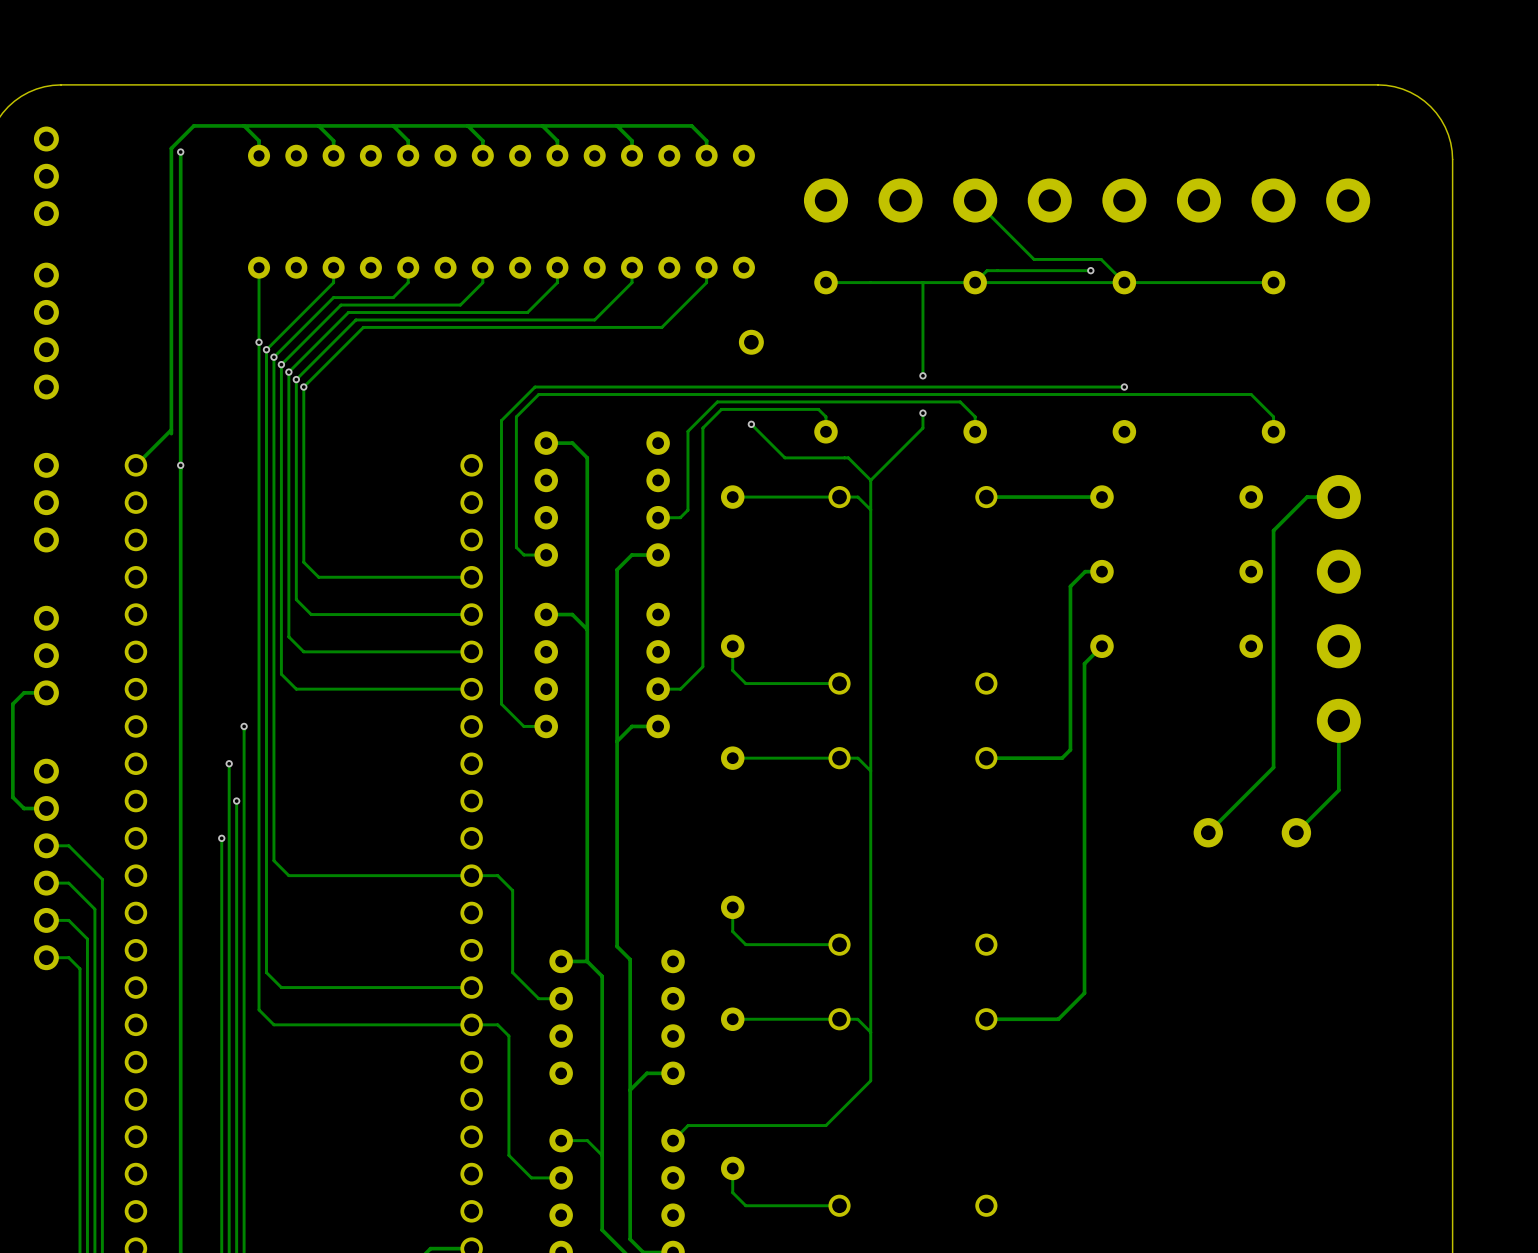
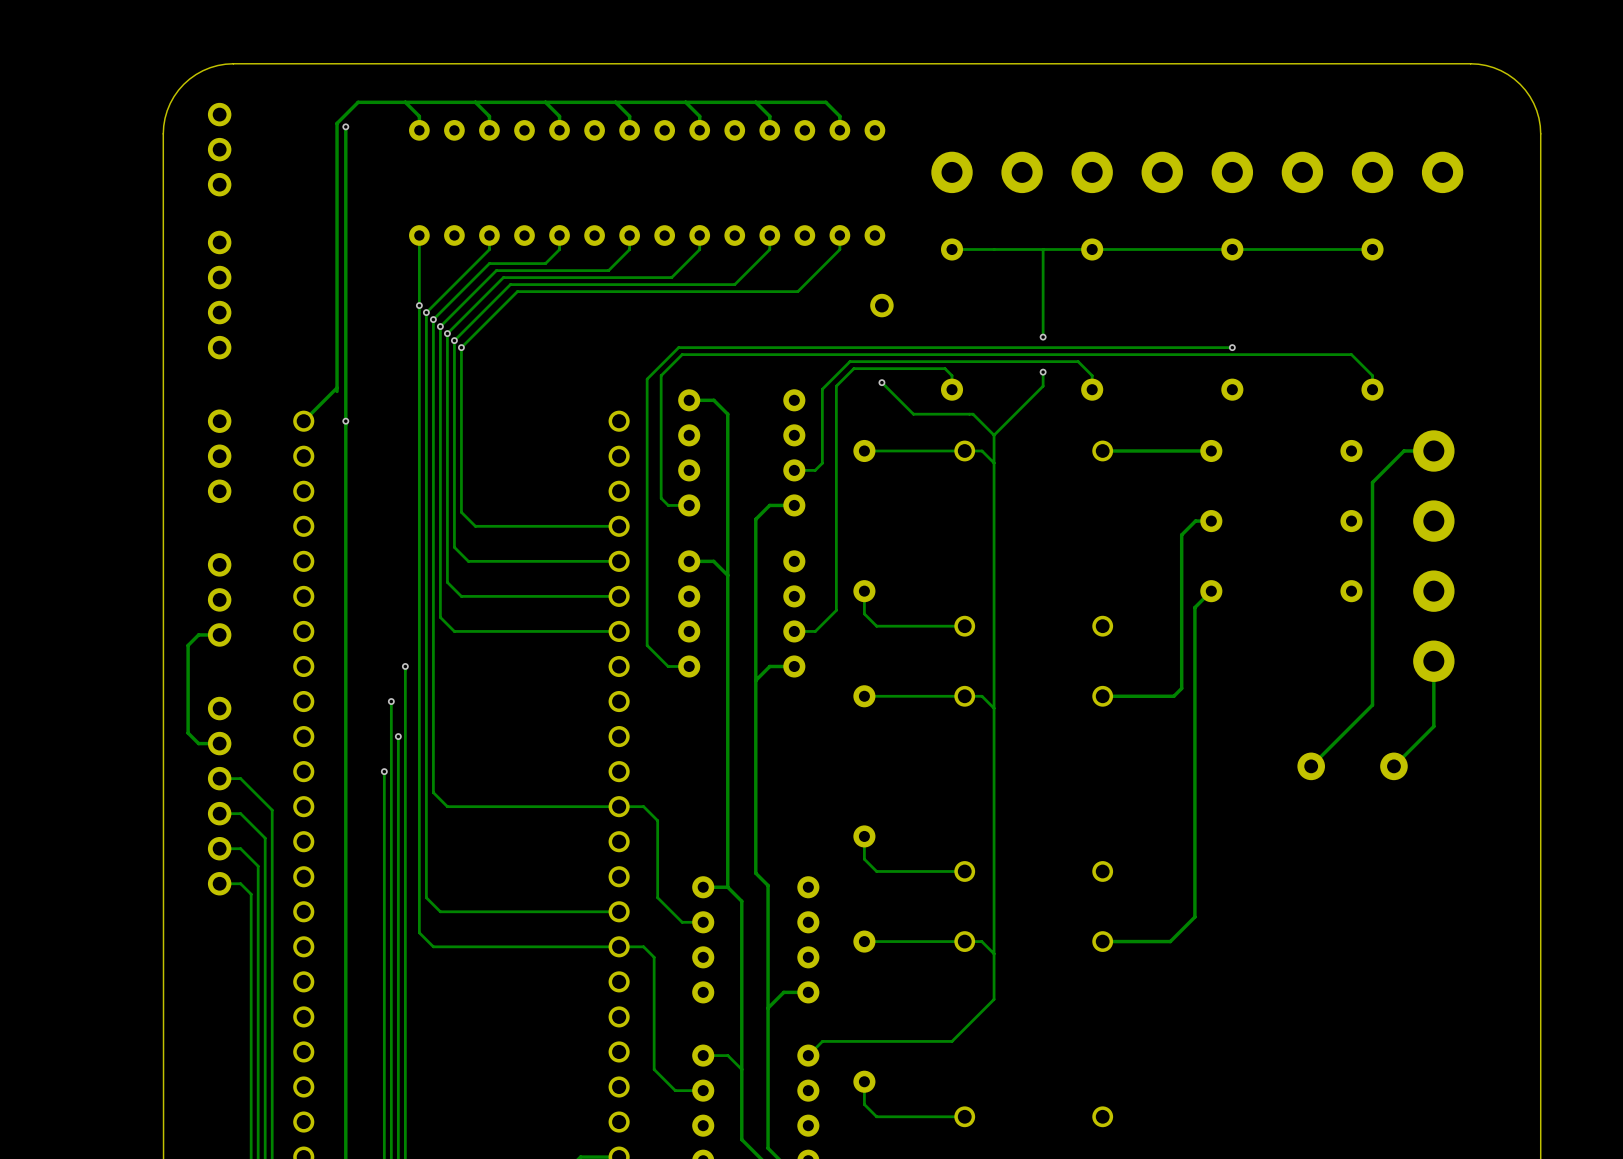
track: (975, 200) (1034, 259) (1101, 259) (1124, 282) -> none
track: (1090, 270) (987, 270) (975, 282) -> none
via: (1090, 270) -> none

